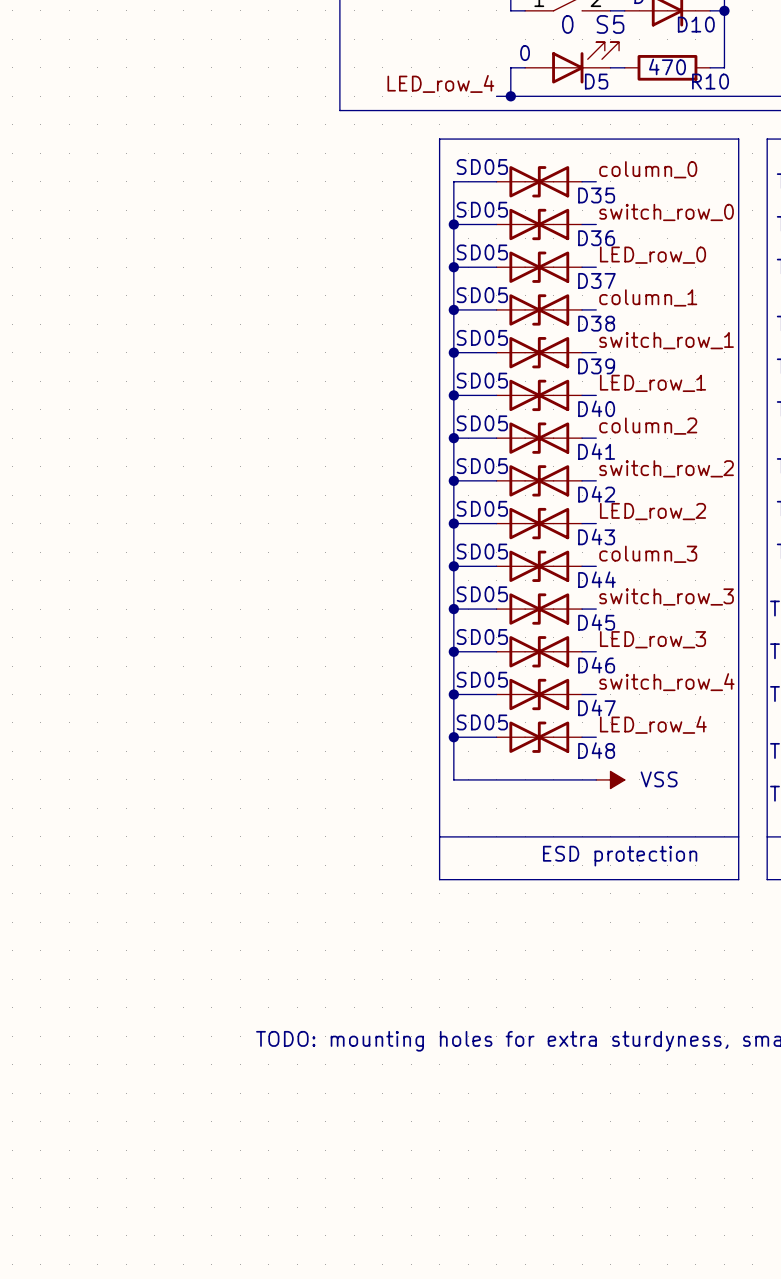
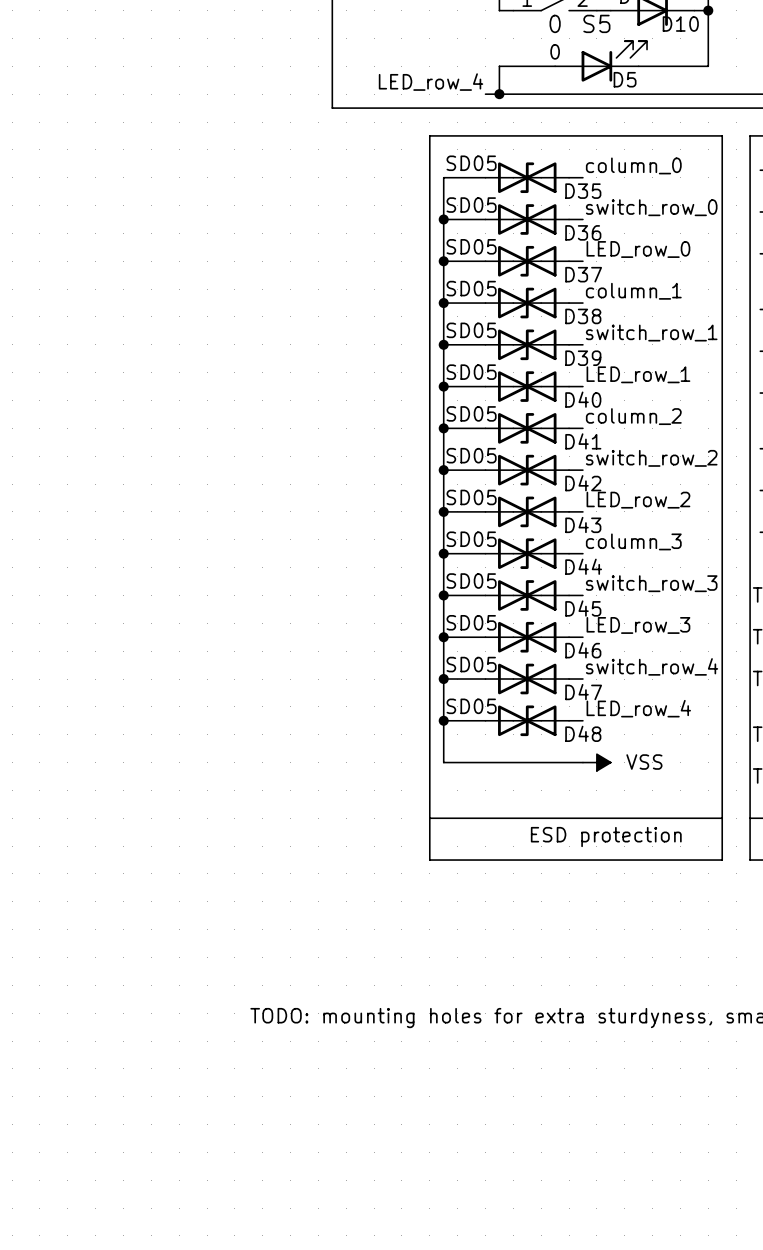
D5 position: (572, 62) -> (601, 61)
wire: none -> (638, 66) (694, 66)
R10: 470 (667, 67) -> none

